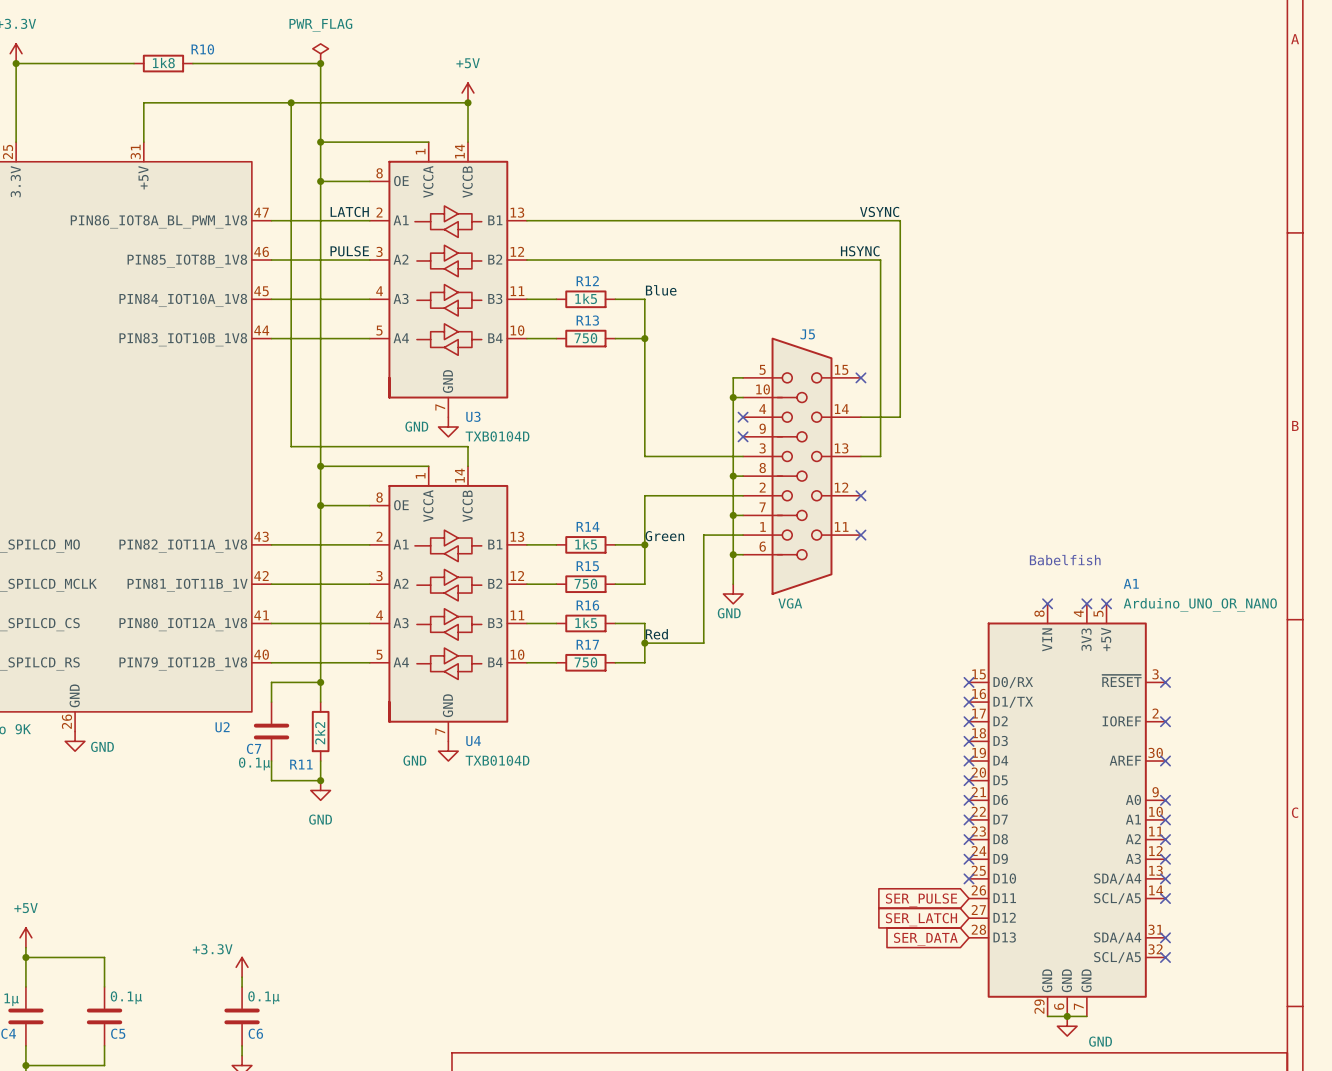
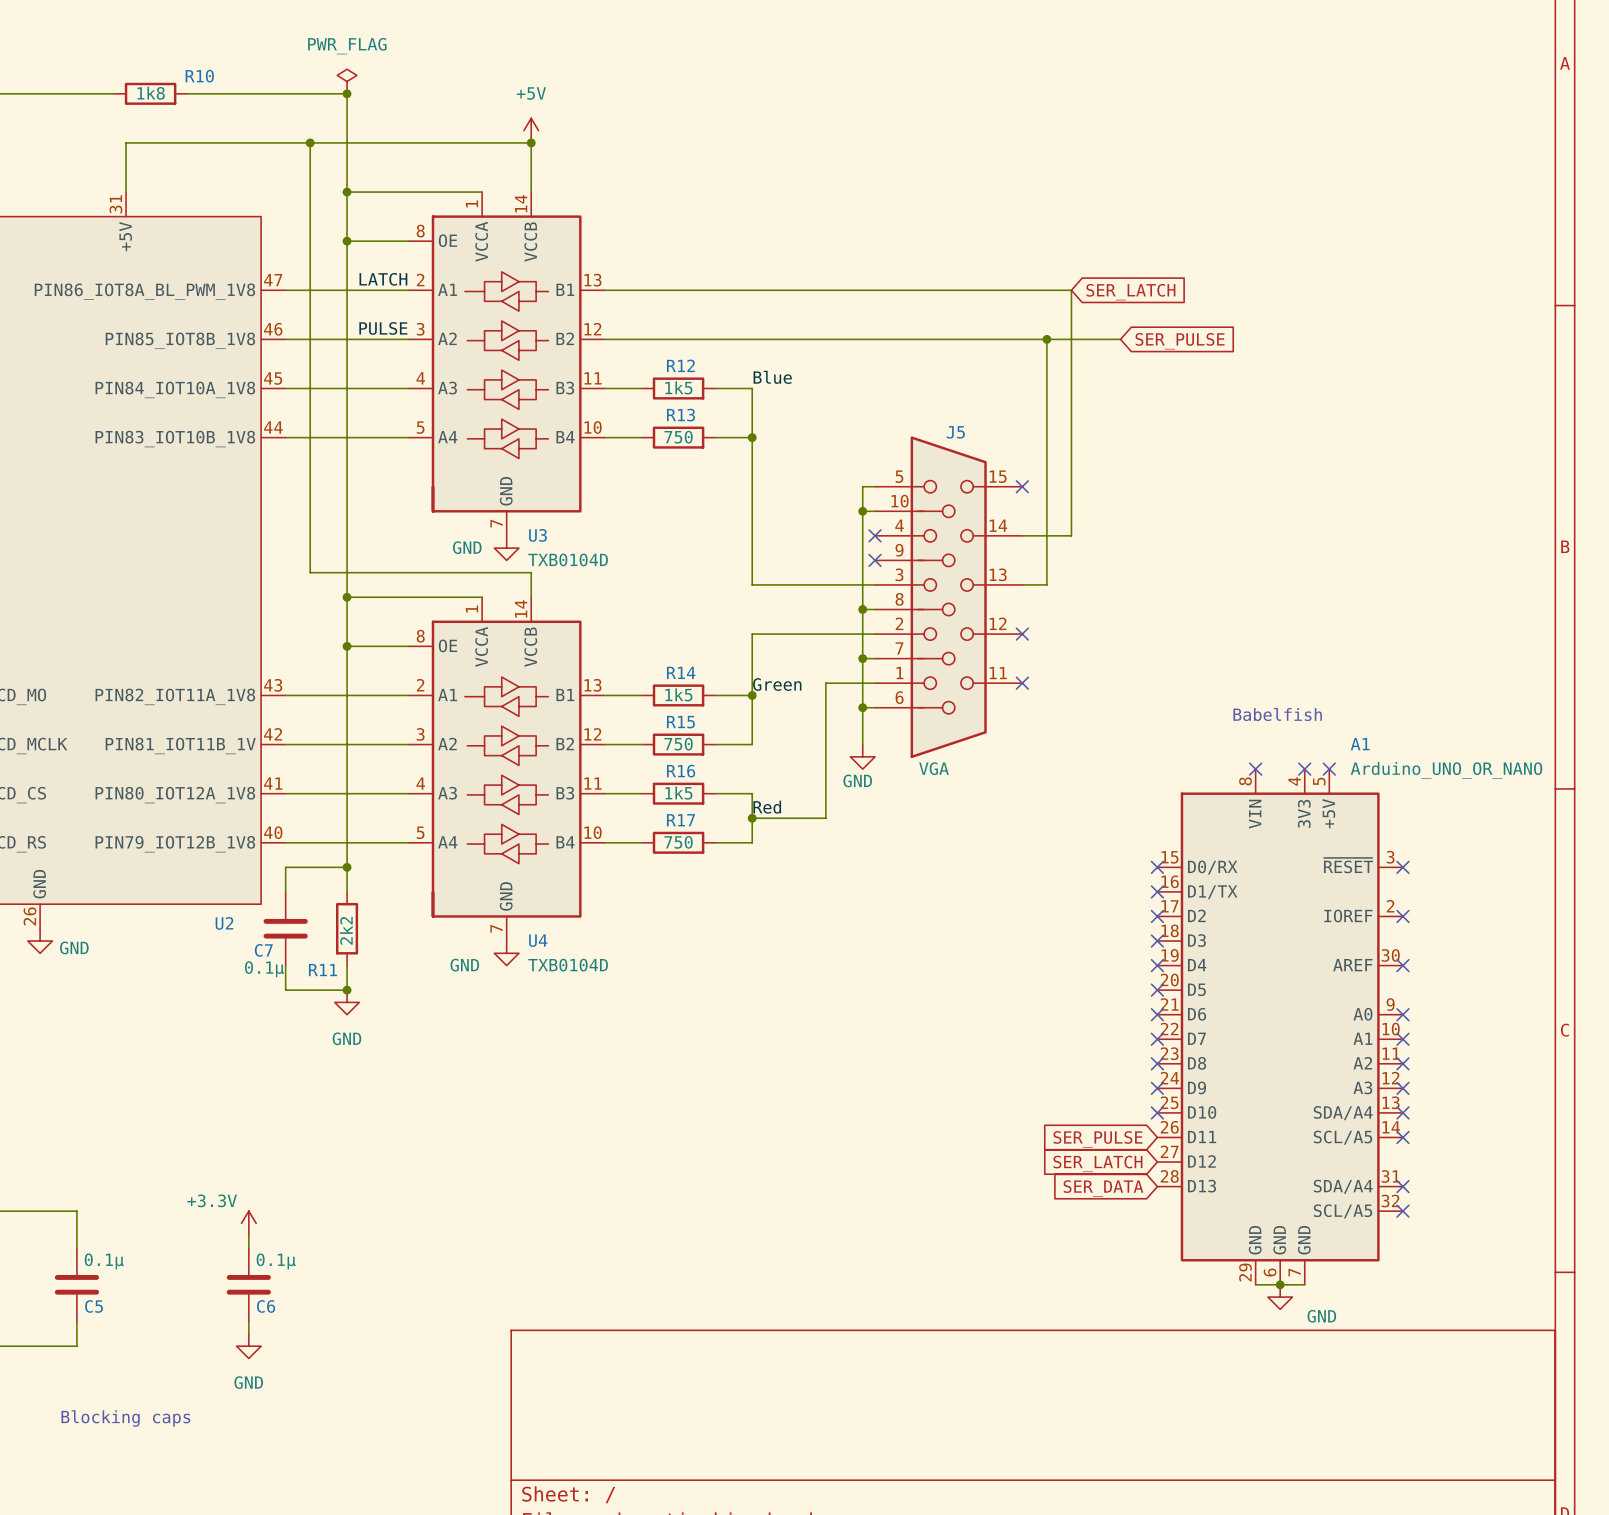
label: VSYNC (879, 211) -> none
global label: none -> SER_LATCH (1130, 292)
label: HSYNC (860, 251) -> none
wire: none -> (1046, 339) (1120, 339)
junction: none -> (1046, 339)
global label: none -> SER_PULSE (1180, 341)

